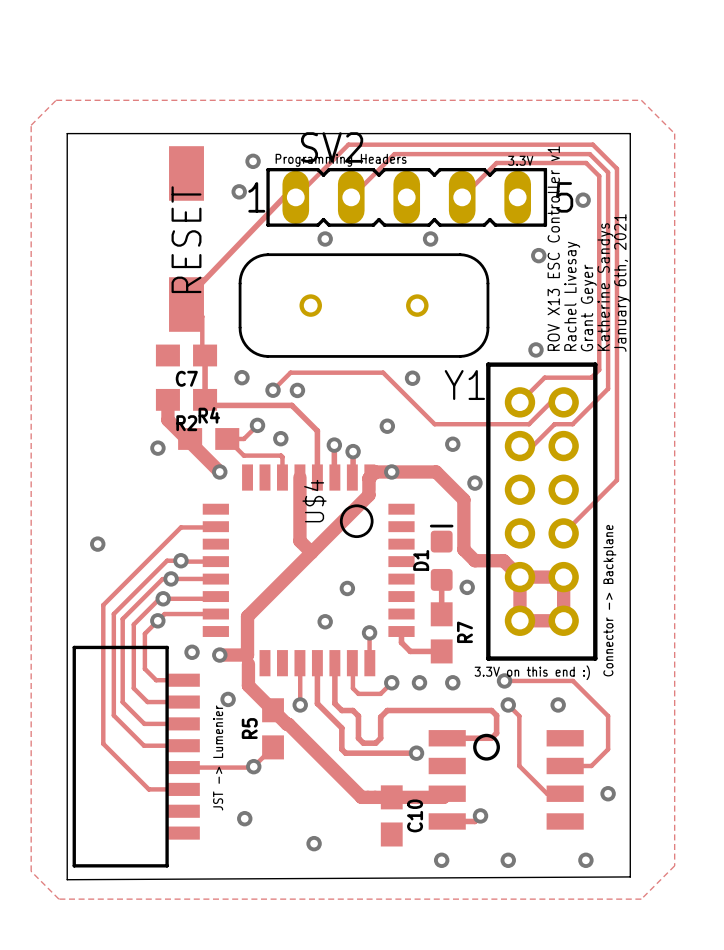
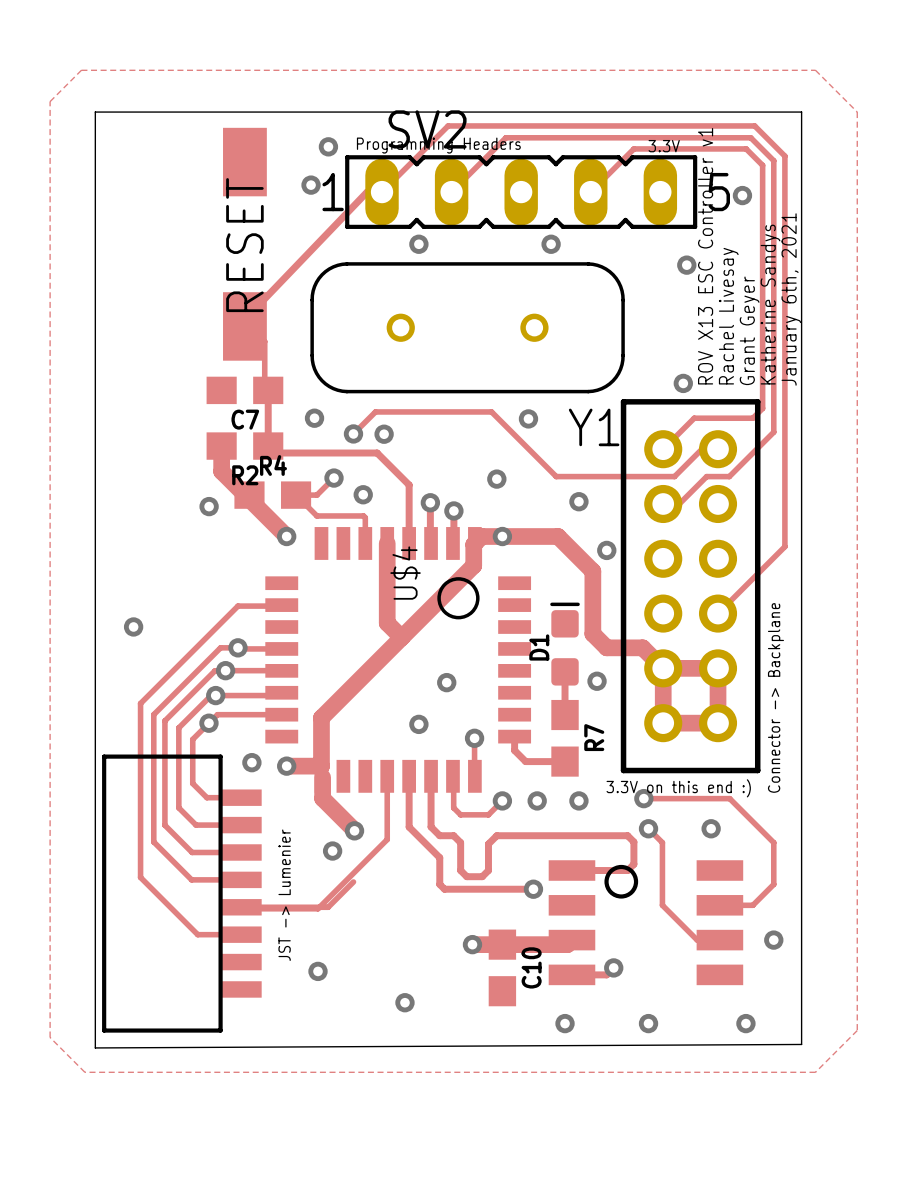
track: (300, 663) (300, 704) -> (387, 776) (387, 839) (318, 908) (242, 908)
track: (248, 680) (248, 685) (361, 797) (367, 797) -> (322, 798) (354, 830)
via: (228, 699) -> none
via: (300, 704) -> none
via: none -> (354, 830)
via: none -> (332, 851)
R5: (273, 728) -> none
via: (253, 766) -> none
via: none -> (472, 944)

